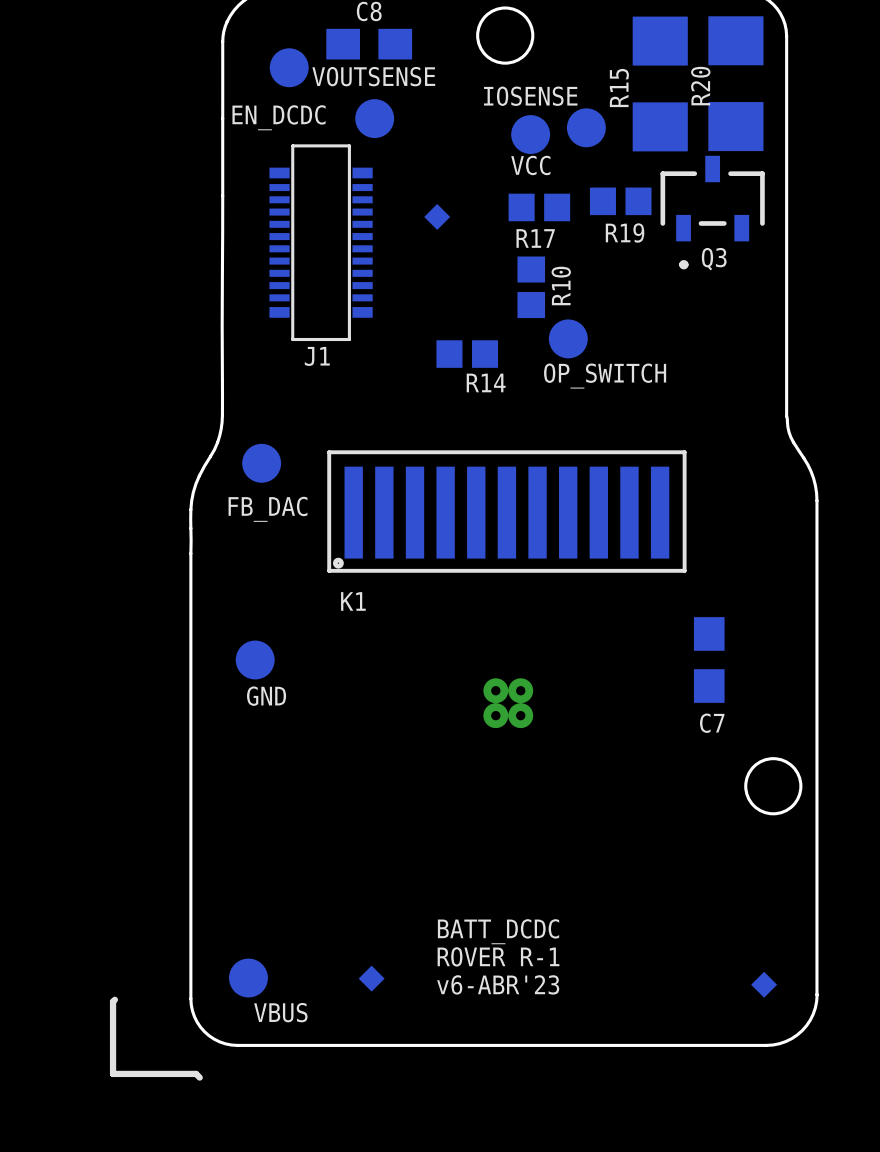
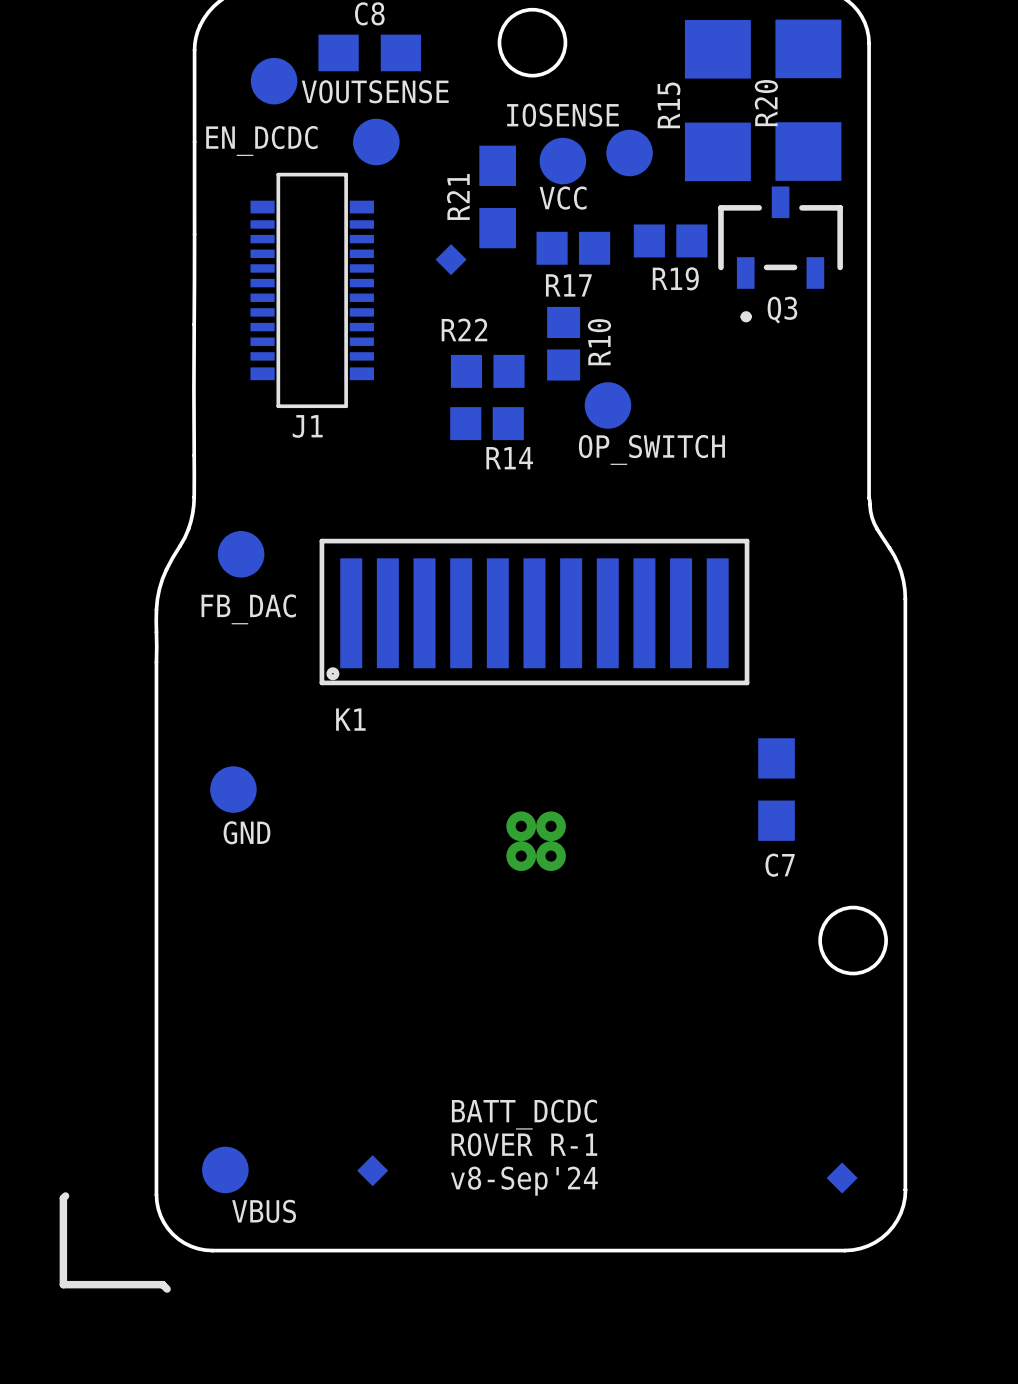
R21: none -> (497, 196)
R22: none -> (487, 371)
text: v6-ABR'23 (498, 984) -> v8-Sep'24 (524, 1181)

